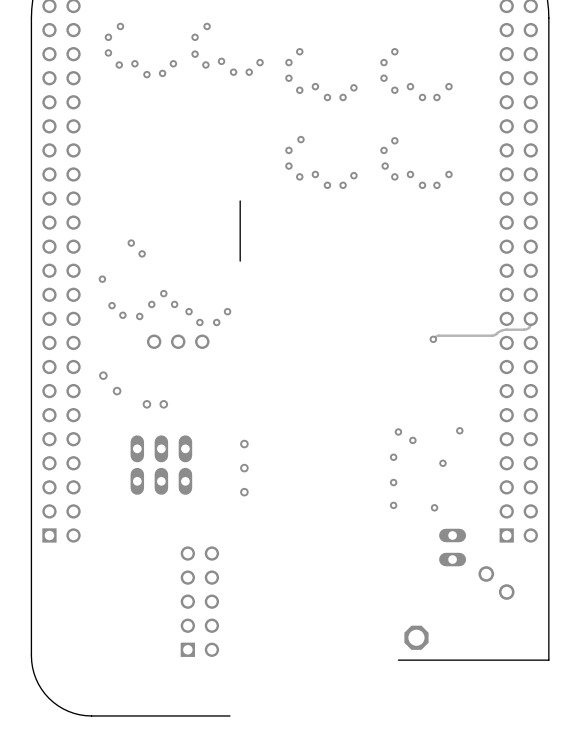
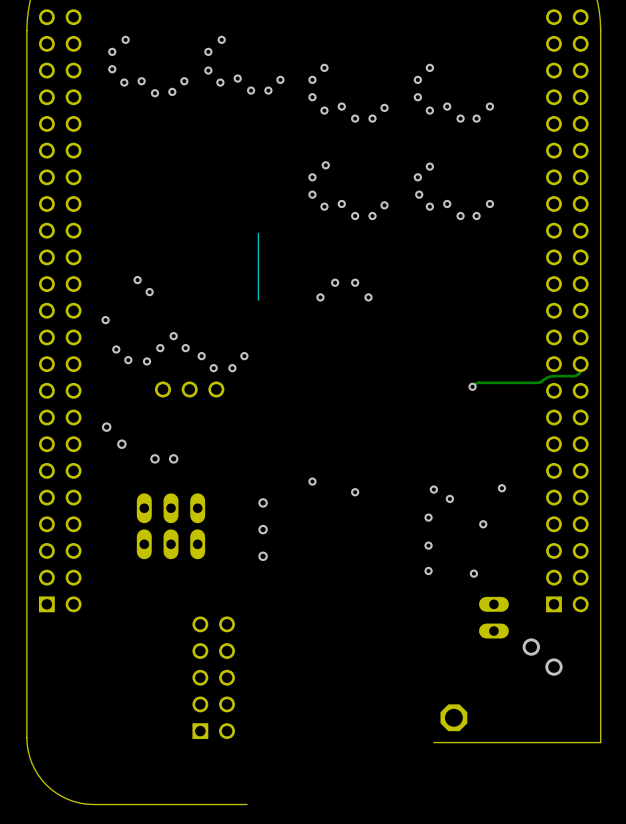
via: none -> (335, 282)
via: none -> (355, 282)
via: none -> (320, 297)
via: none -> (368, 297)
via: none -> (312, 481)
via: none -> (355, 492)

